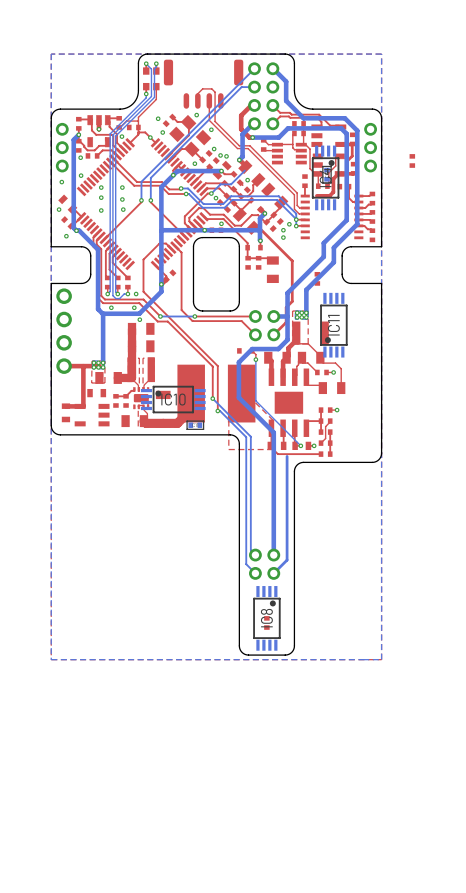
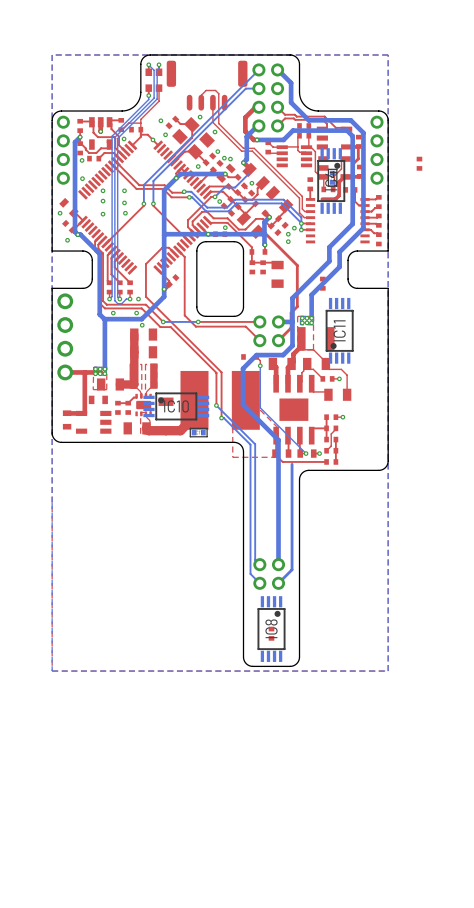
part footprint: [55, 122, 69, 173] -> [56, 115, 70, 185]
part footprint: [364, 122, 378, 173] -> [370, 115, 384, 185]
via: (61, 182) -> none

